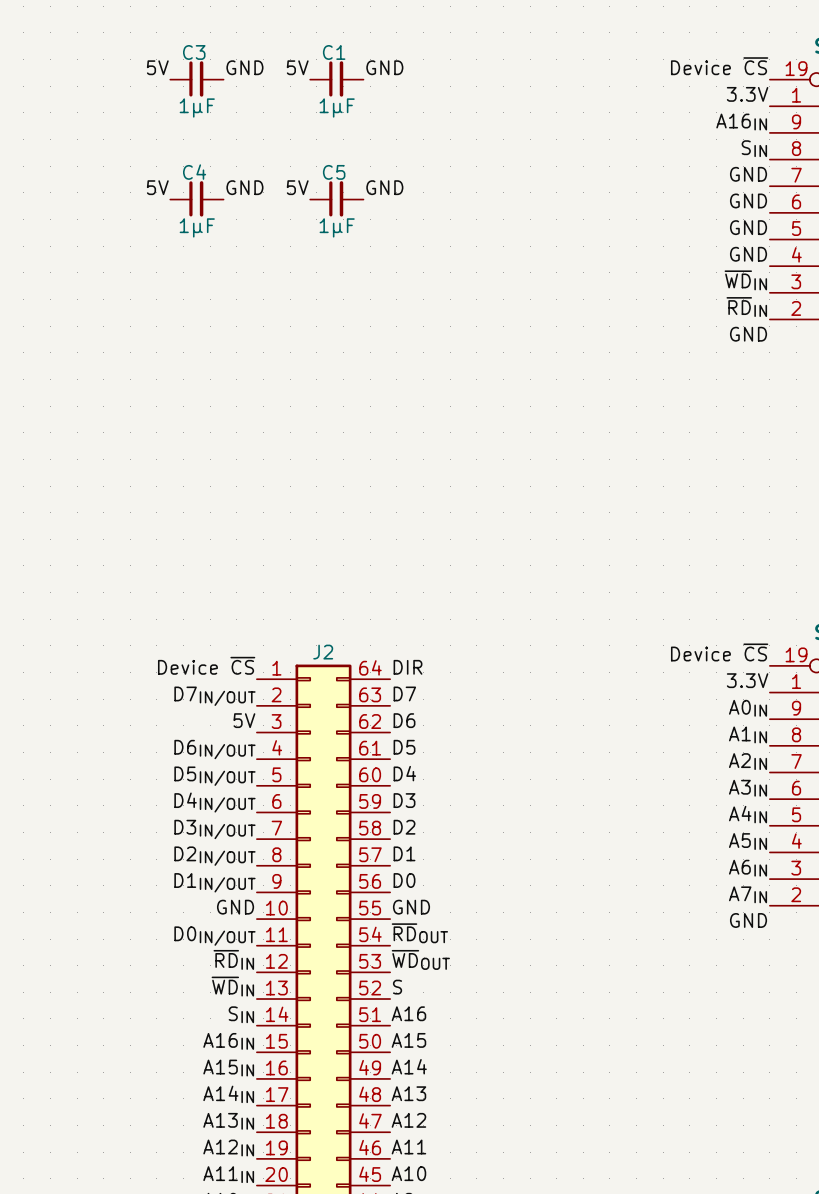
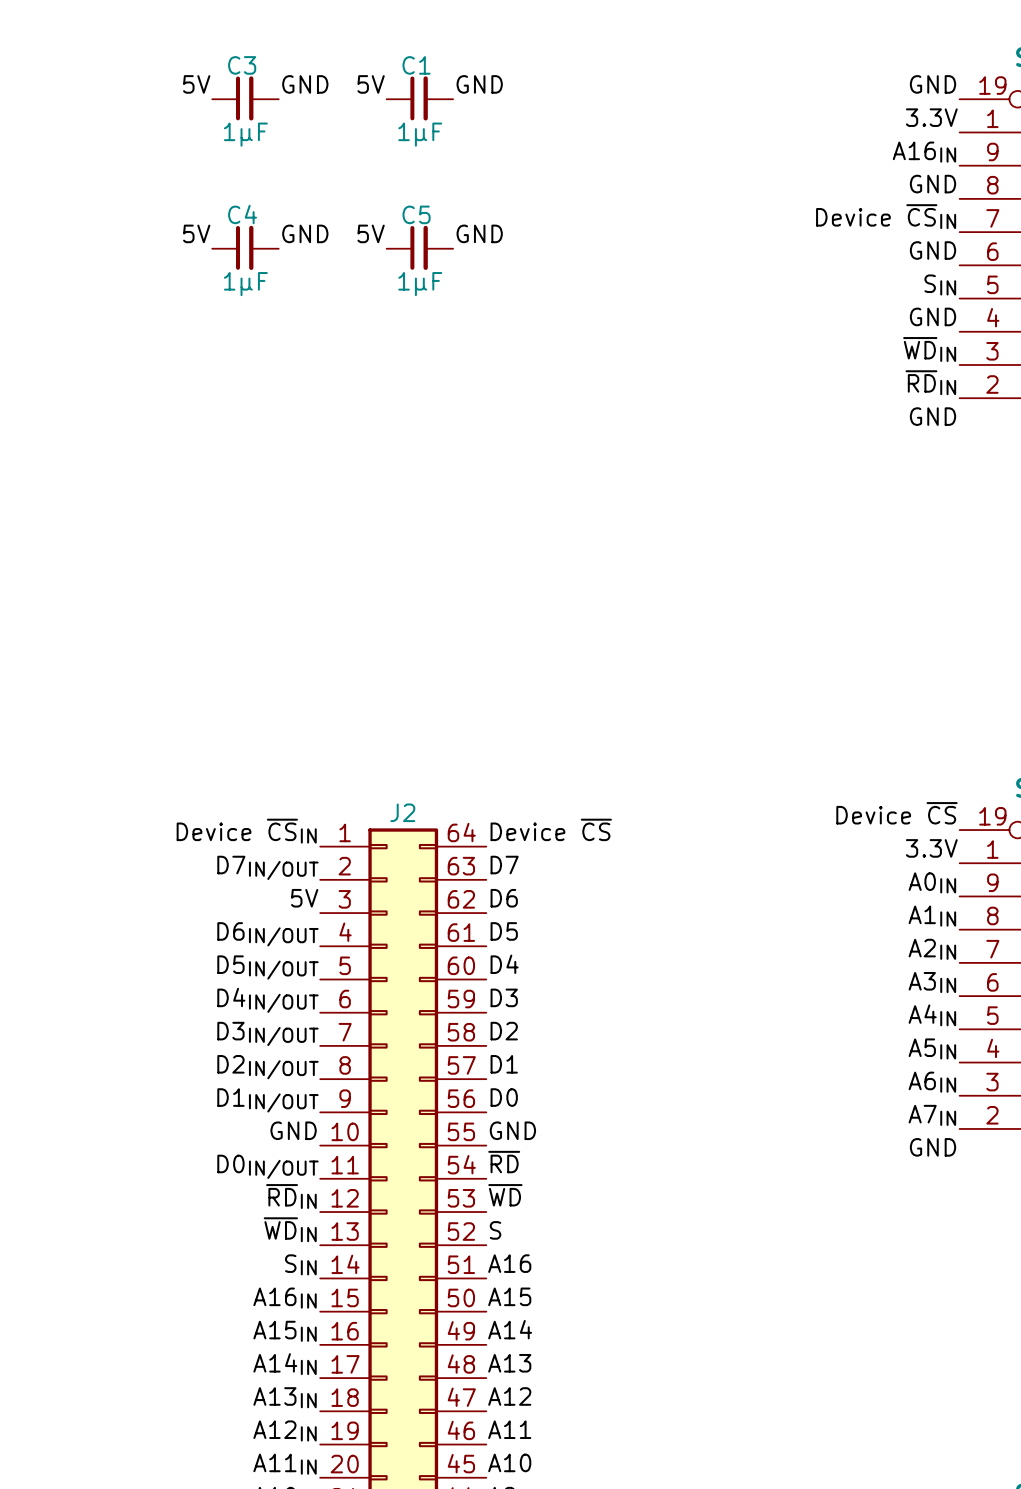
label: Device ~{CS} (719, 66) -> GND (933, 84)
label: SIN (754, 148) -> GND (933, 184)
label: GND (748, 174) -> Device ~{CS}IN (886, 216)
label: GND (748, 227) -> SIN (940, 284)
label: Device ~{CS} (206, 665) -> Device ~{CS}IN (246, 831)
label: DIR (408, 667) -> Device ~{CS} (551, 829)
label: ~{RD}OUT (419, 933) -> ~{RD} (504, 1162)
label: ~{WD}OUT (420, 959) -> ~{WD} (505, 1195)

